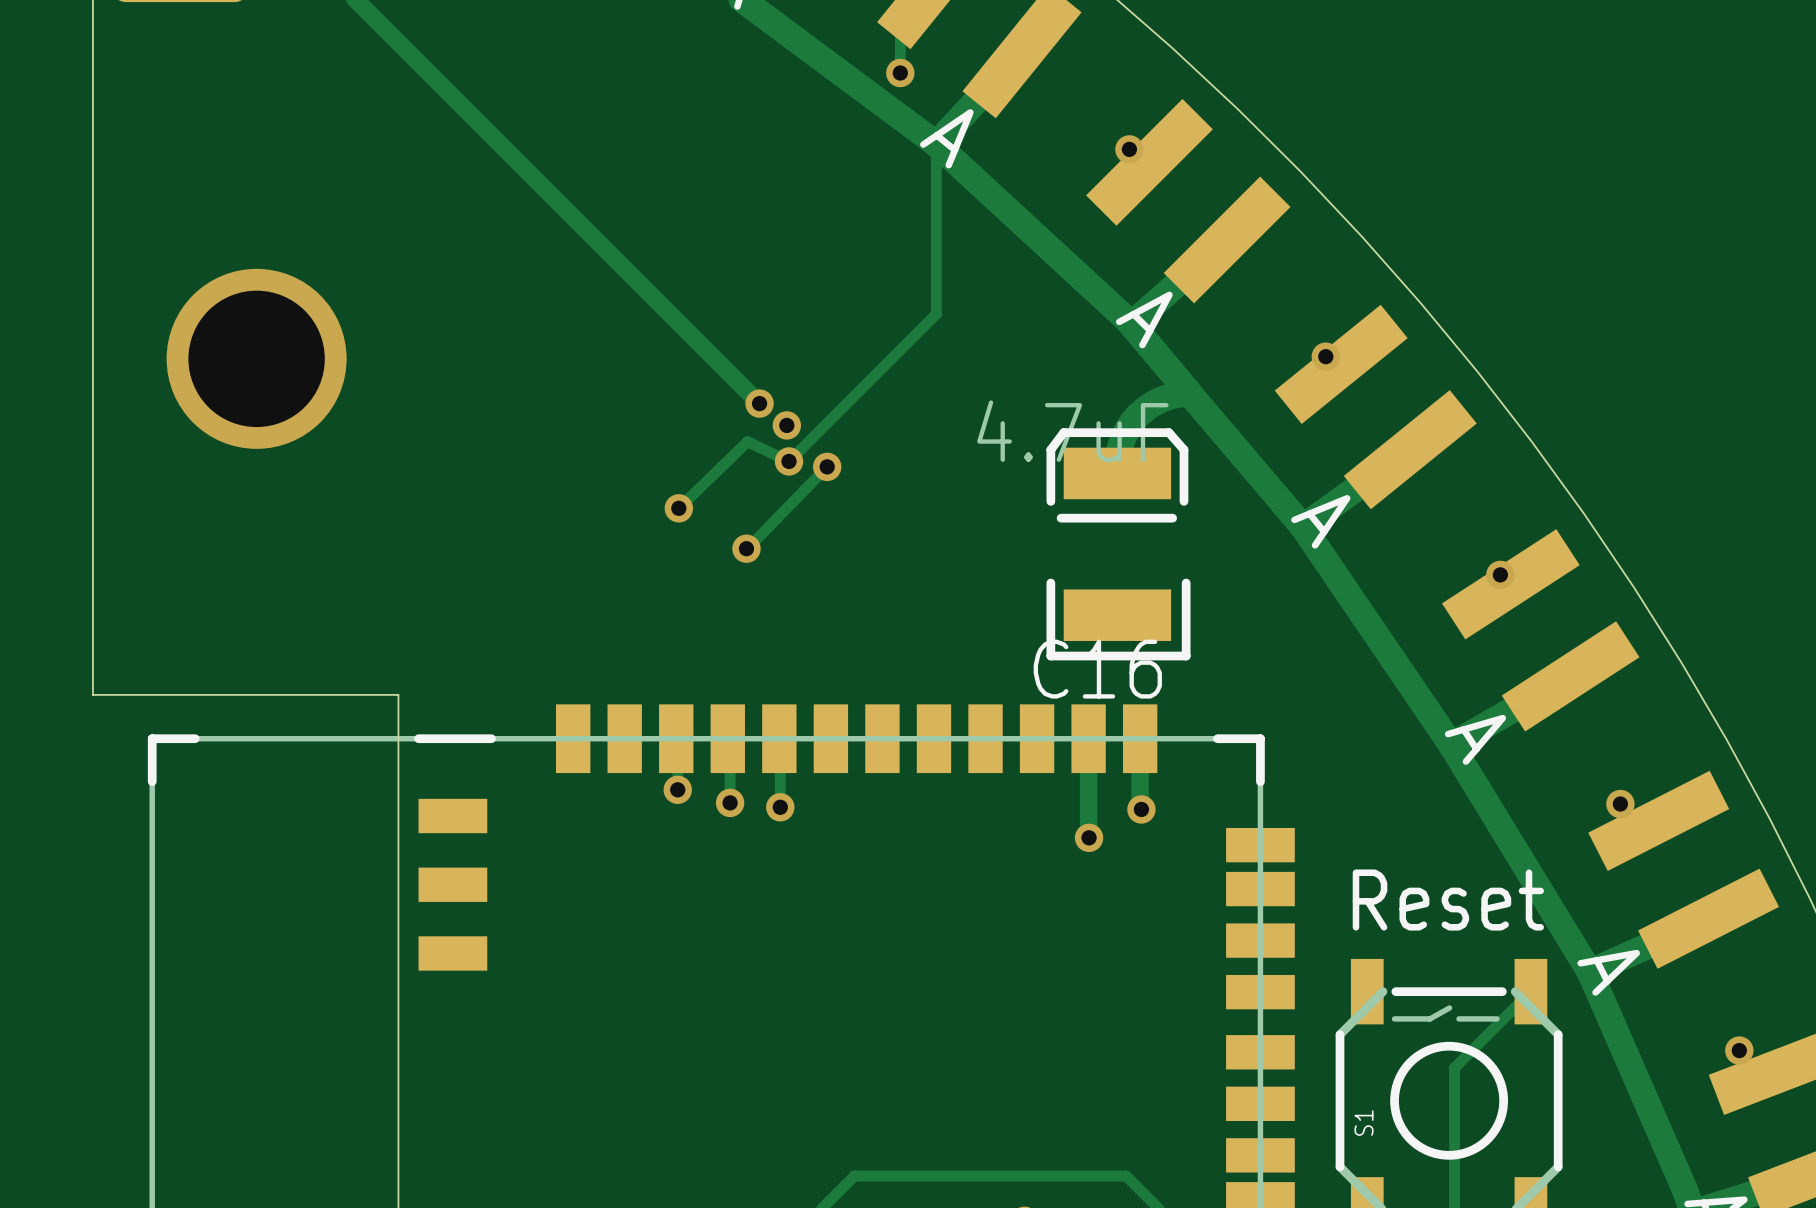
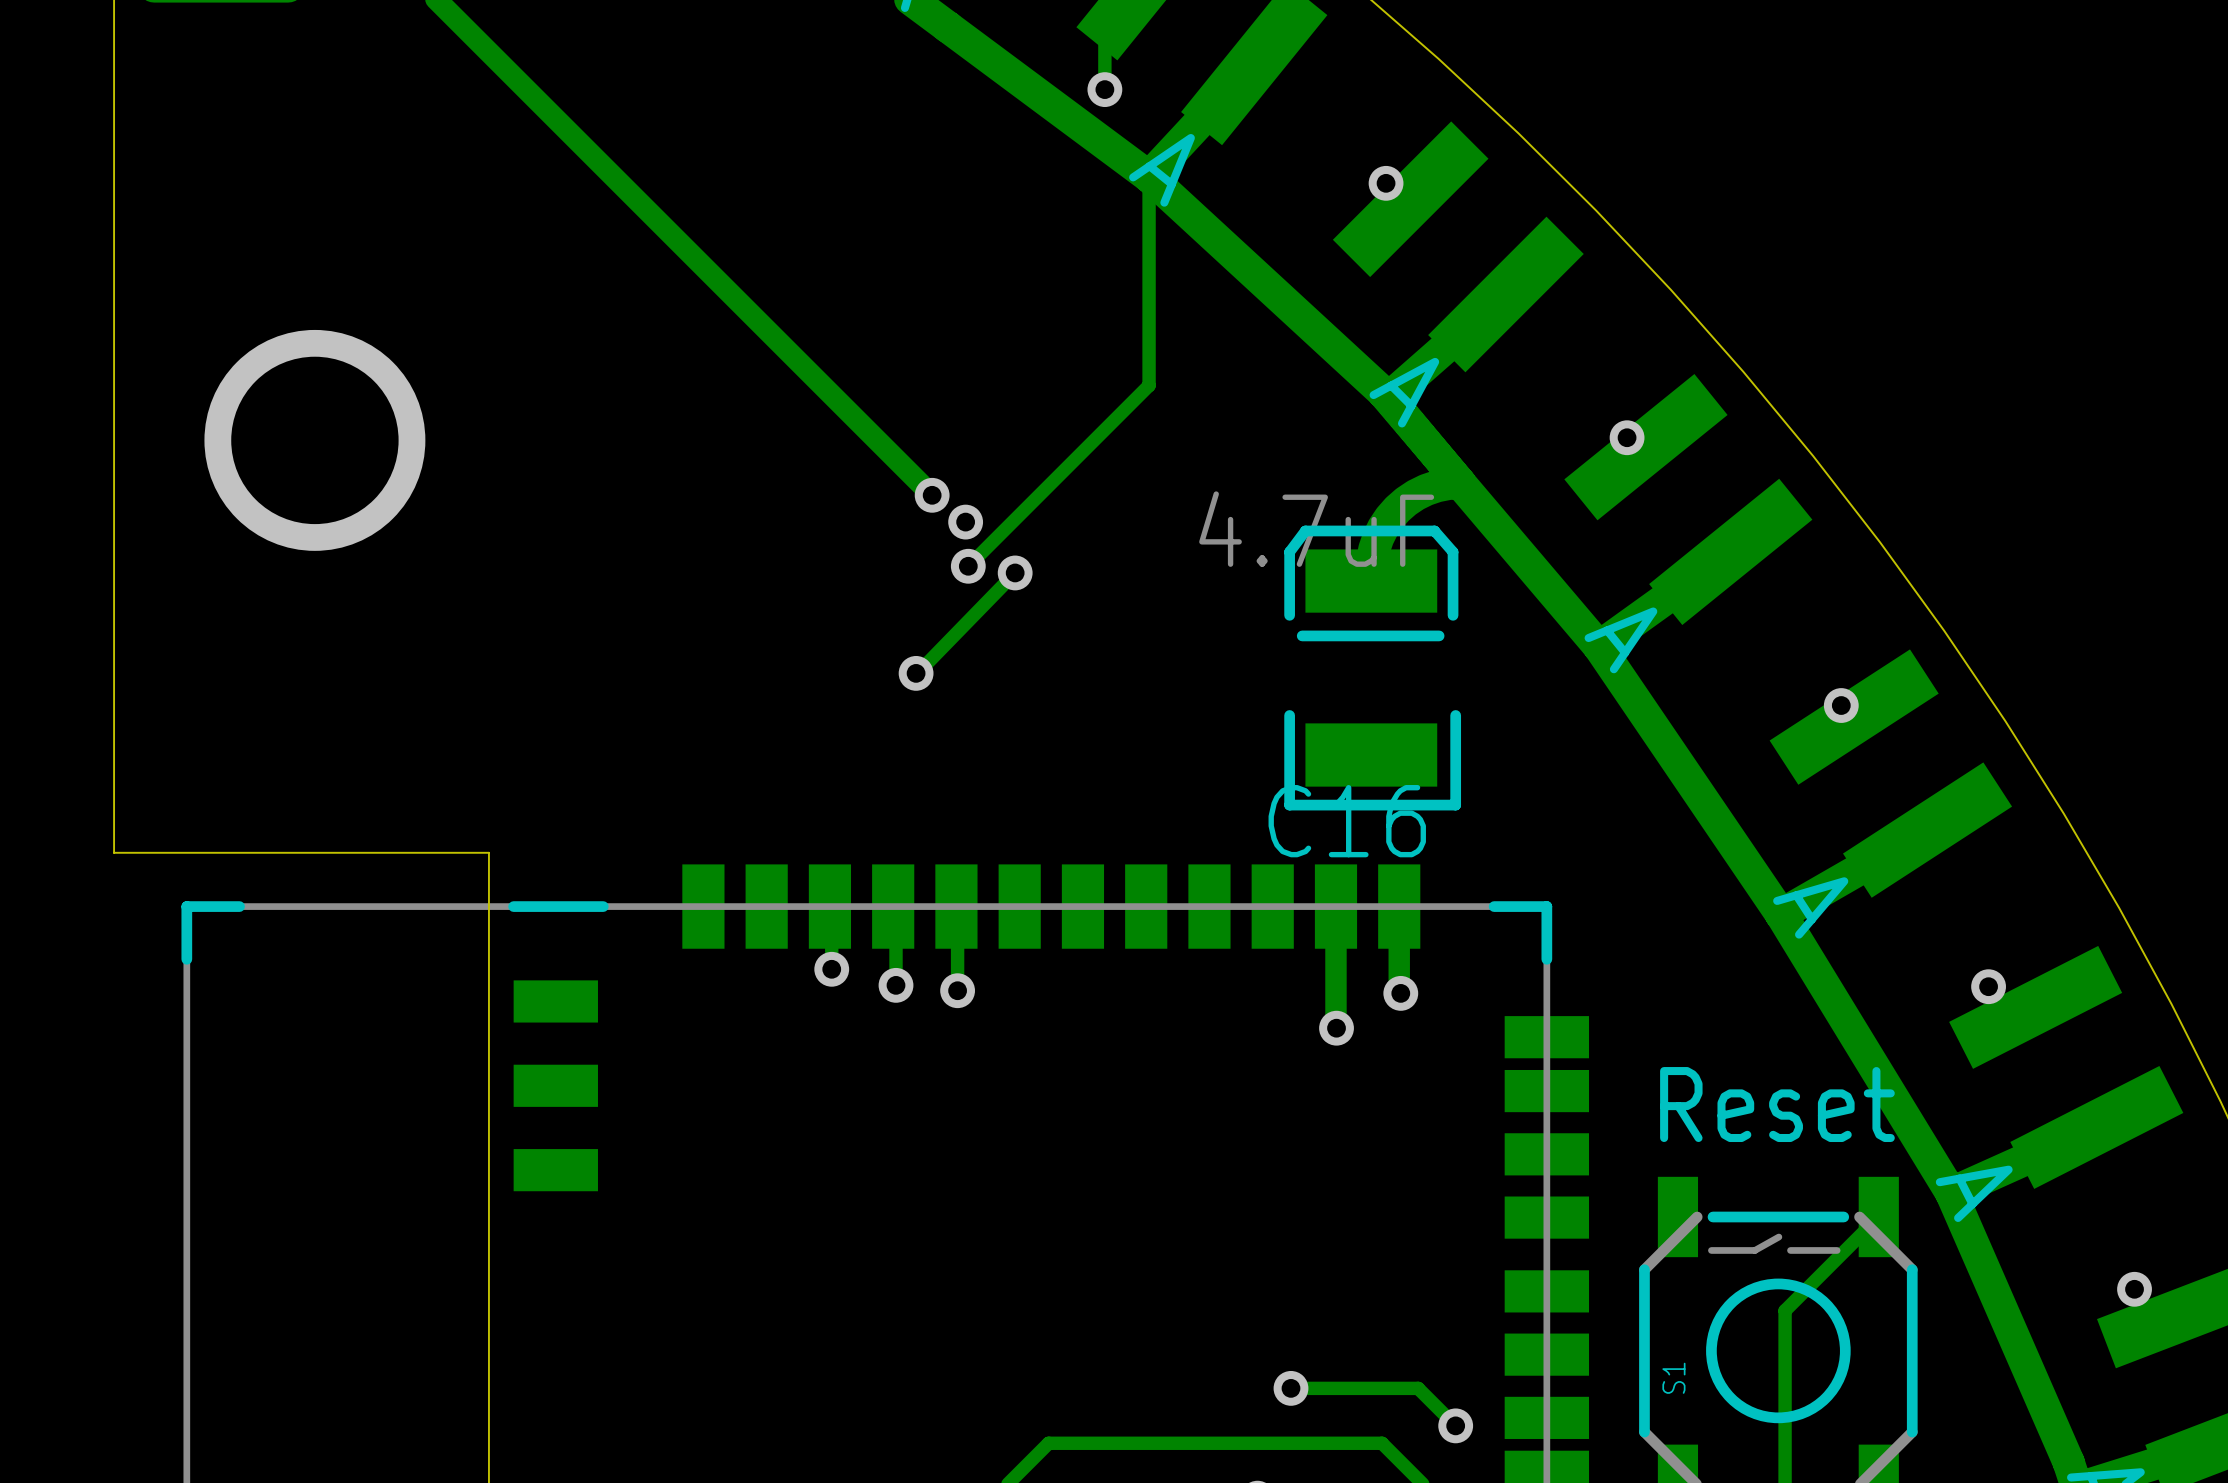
track: (789, 461) (747, 441) (678, 508) -> none
via: (678, 508) -> none
track: none -> (1290, 1388) (1418, 1388) (1455, 1425)
via: none -> (1290, 1388)
via: none -> (1455, 1425)

